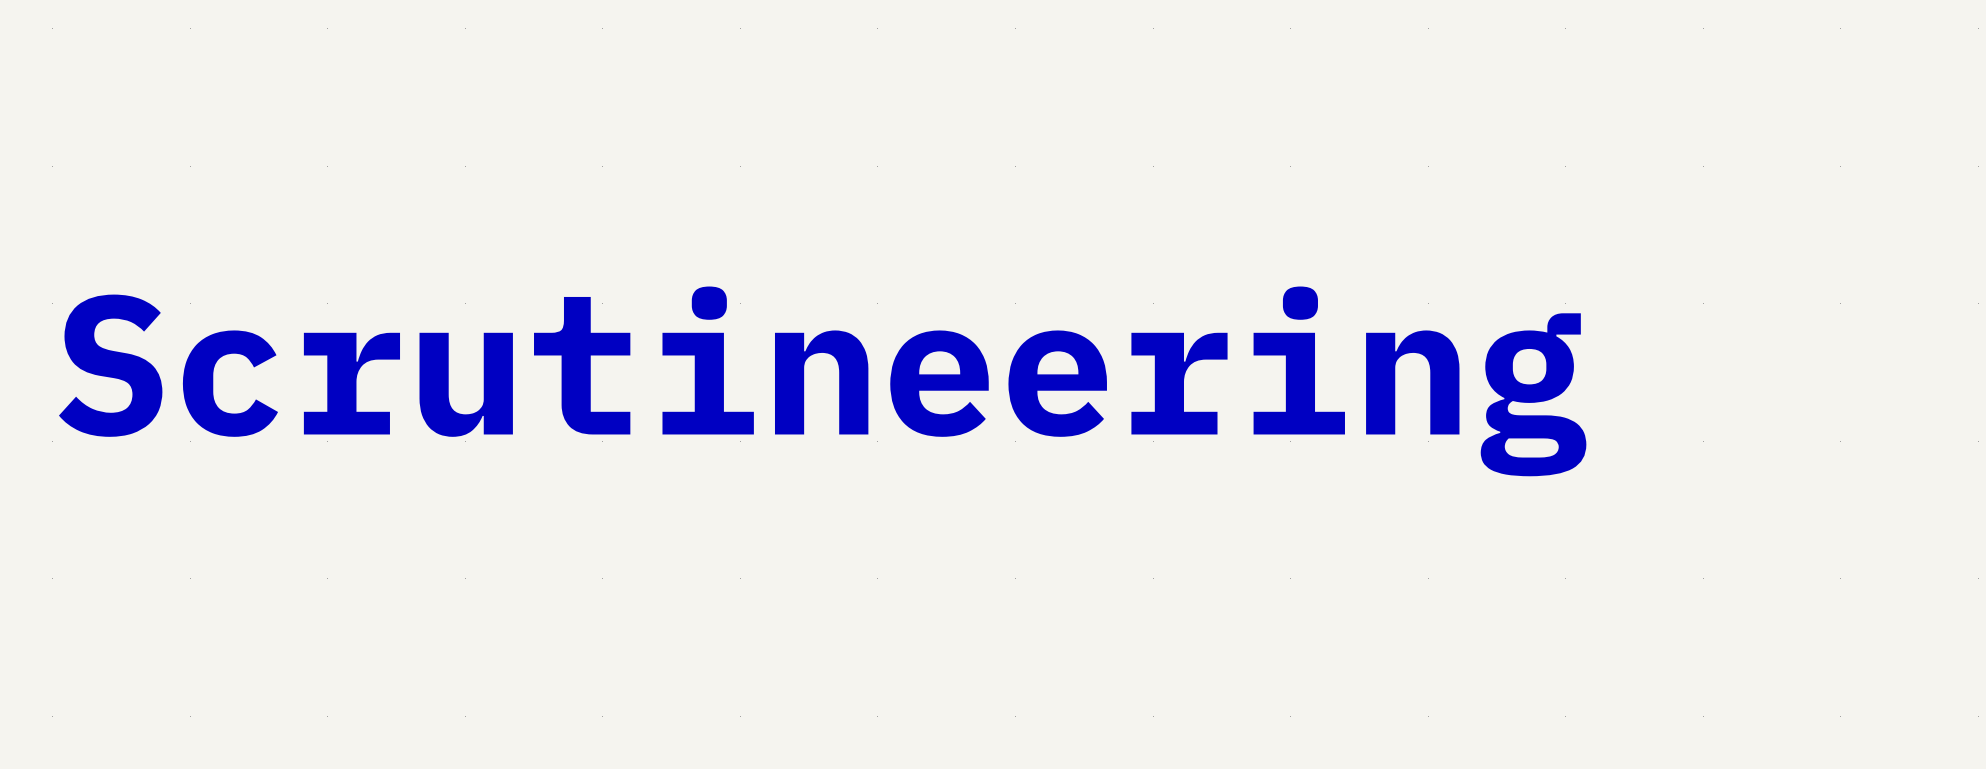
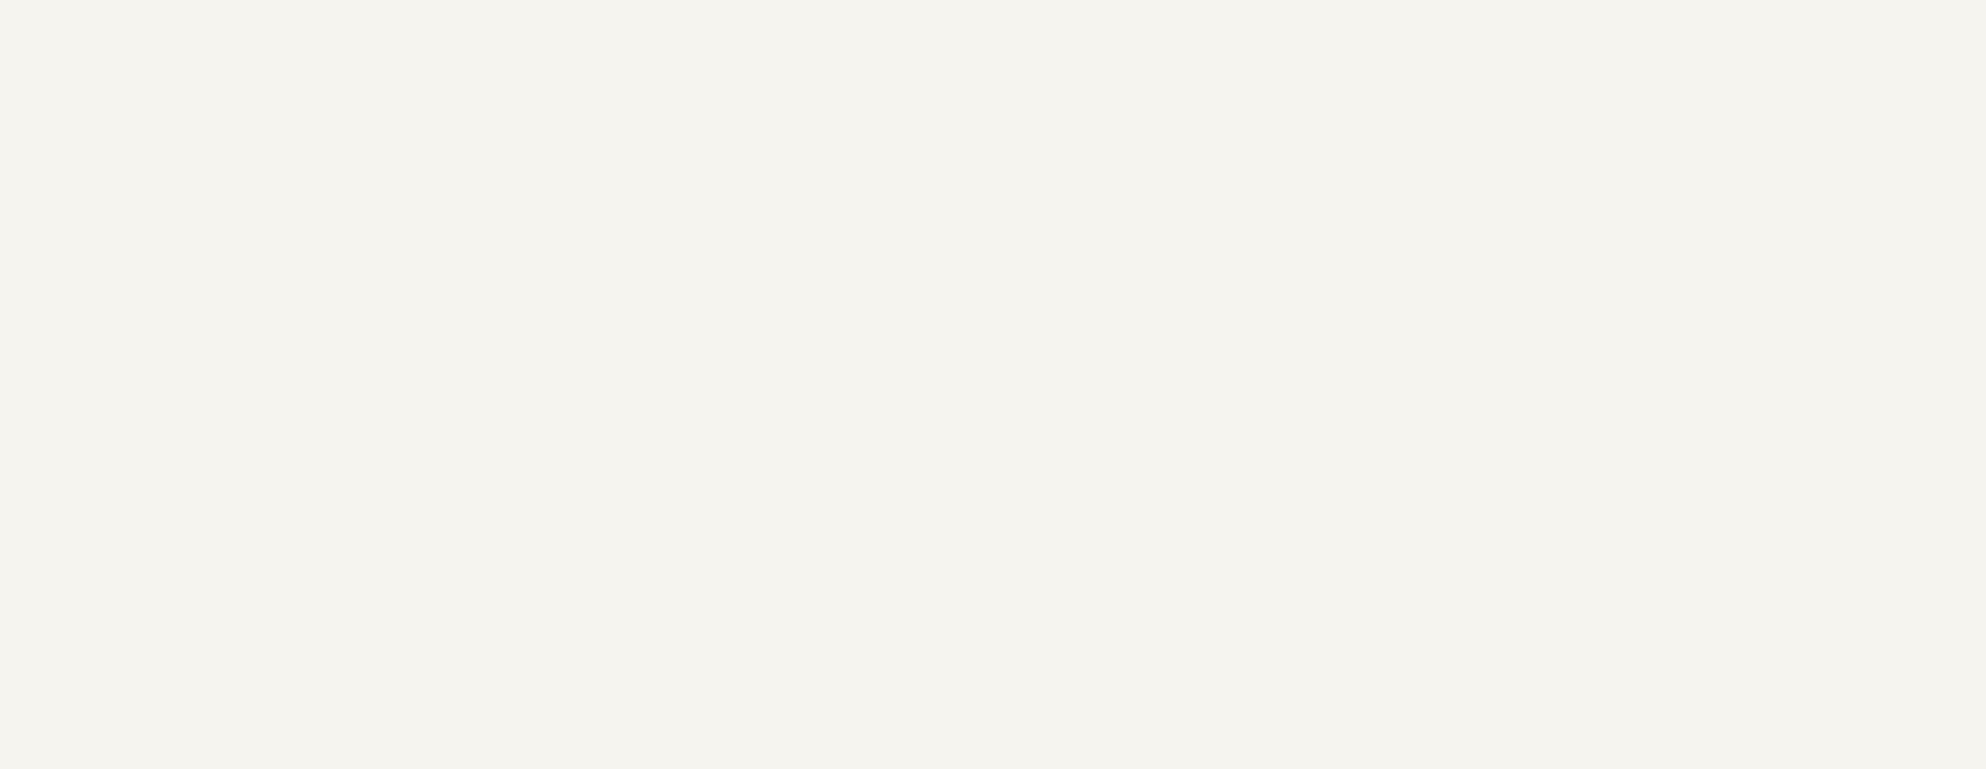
text: Scrutineering (822, 381) -> none

